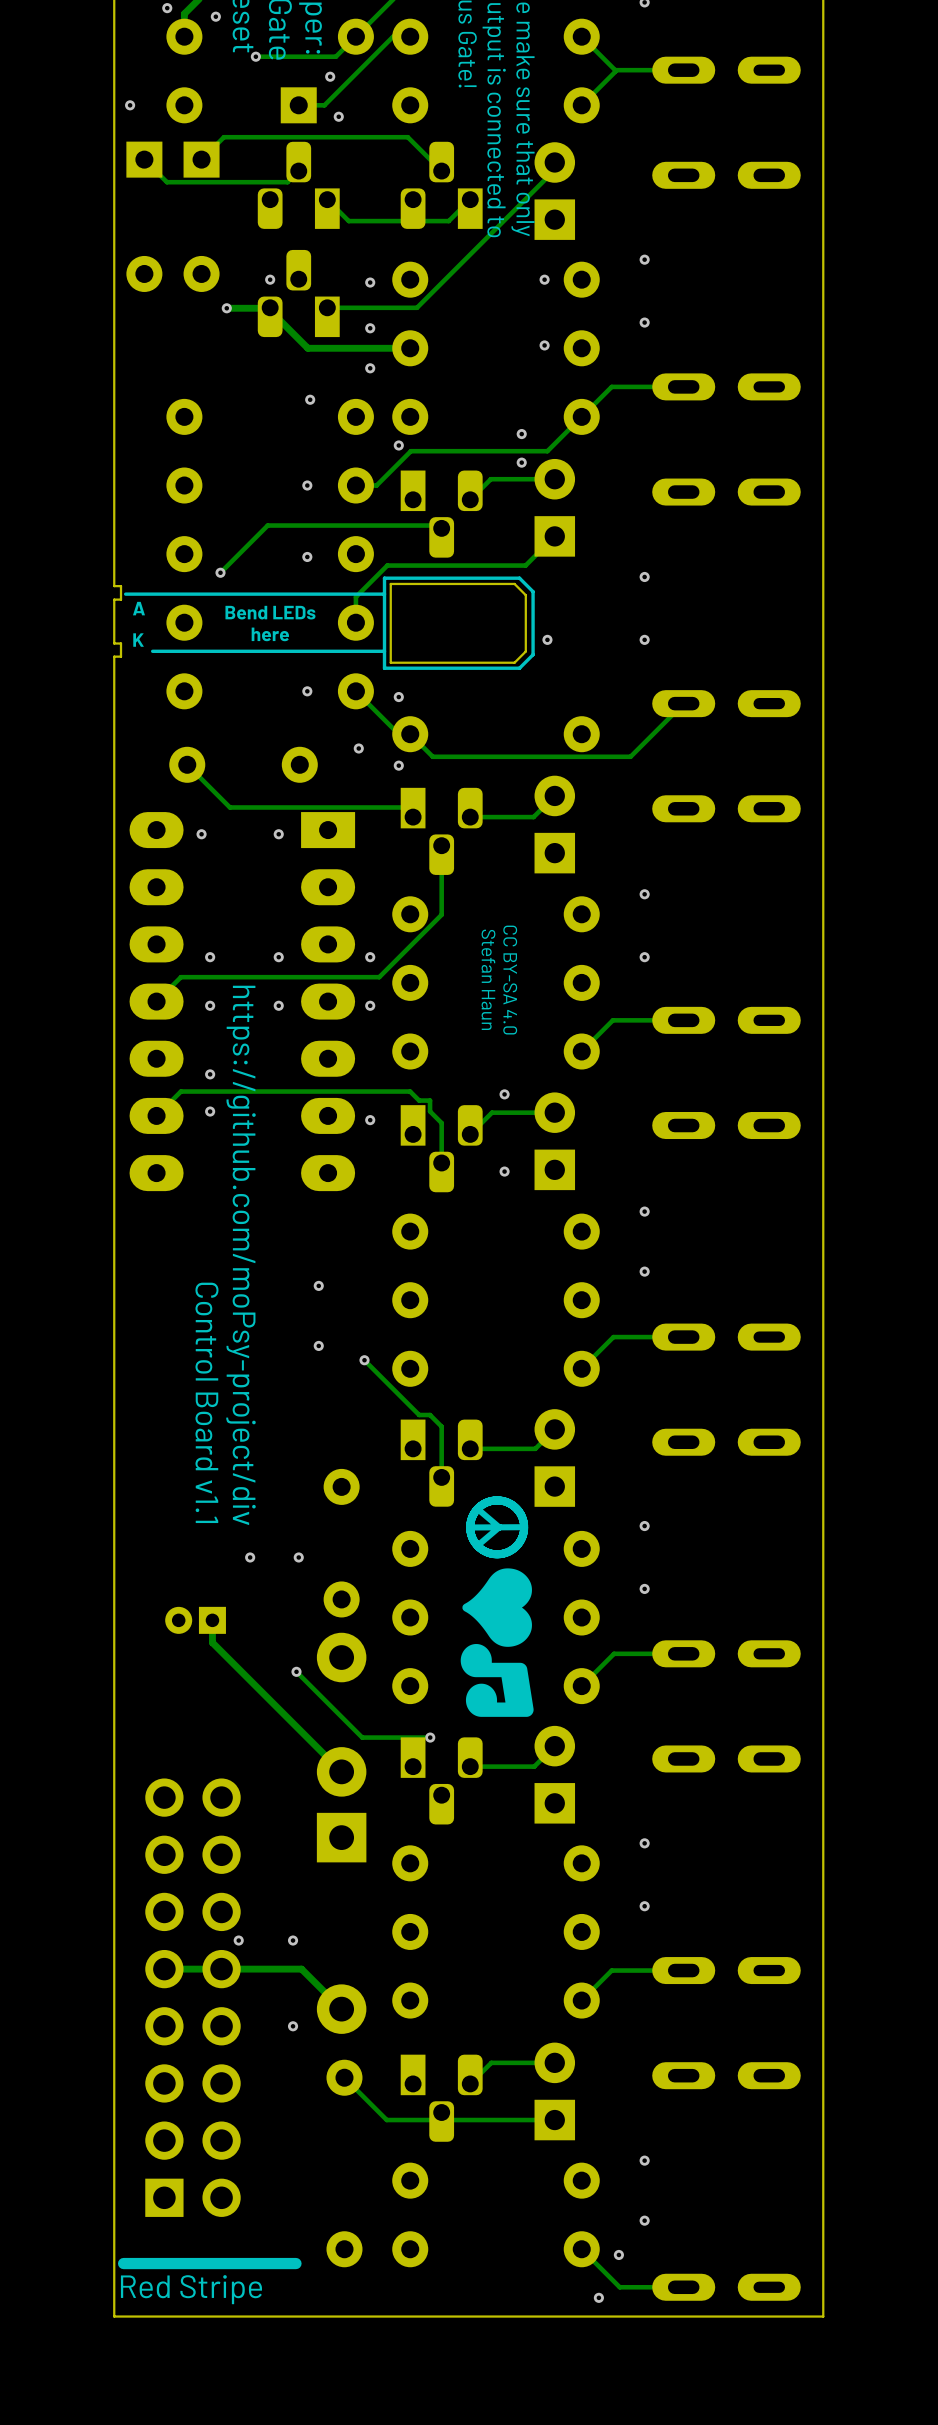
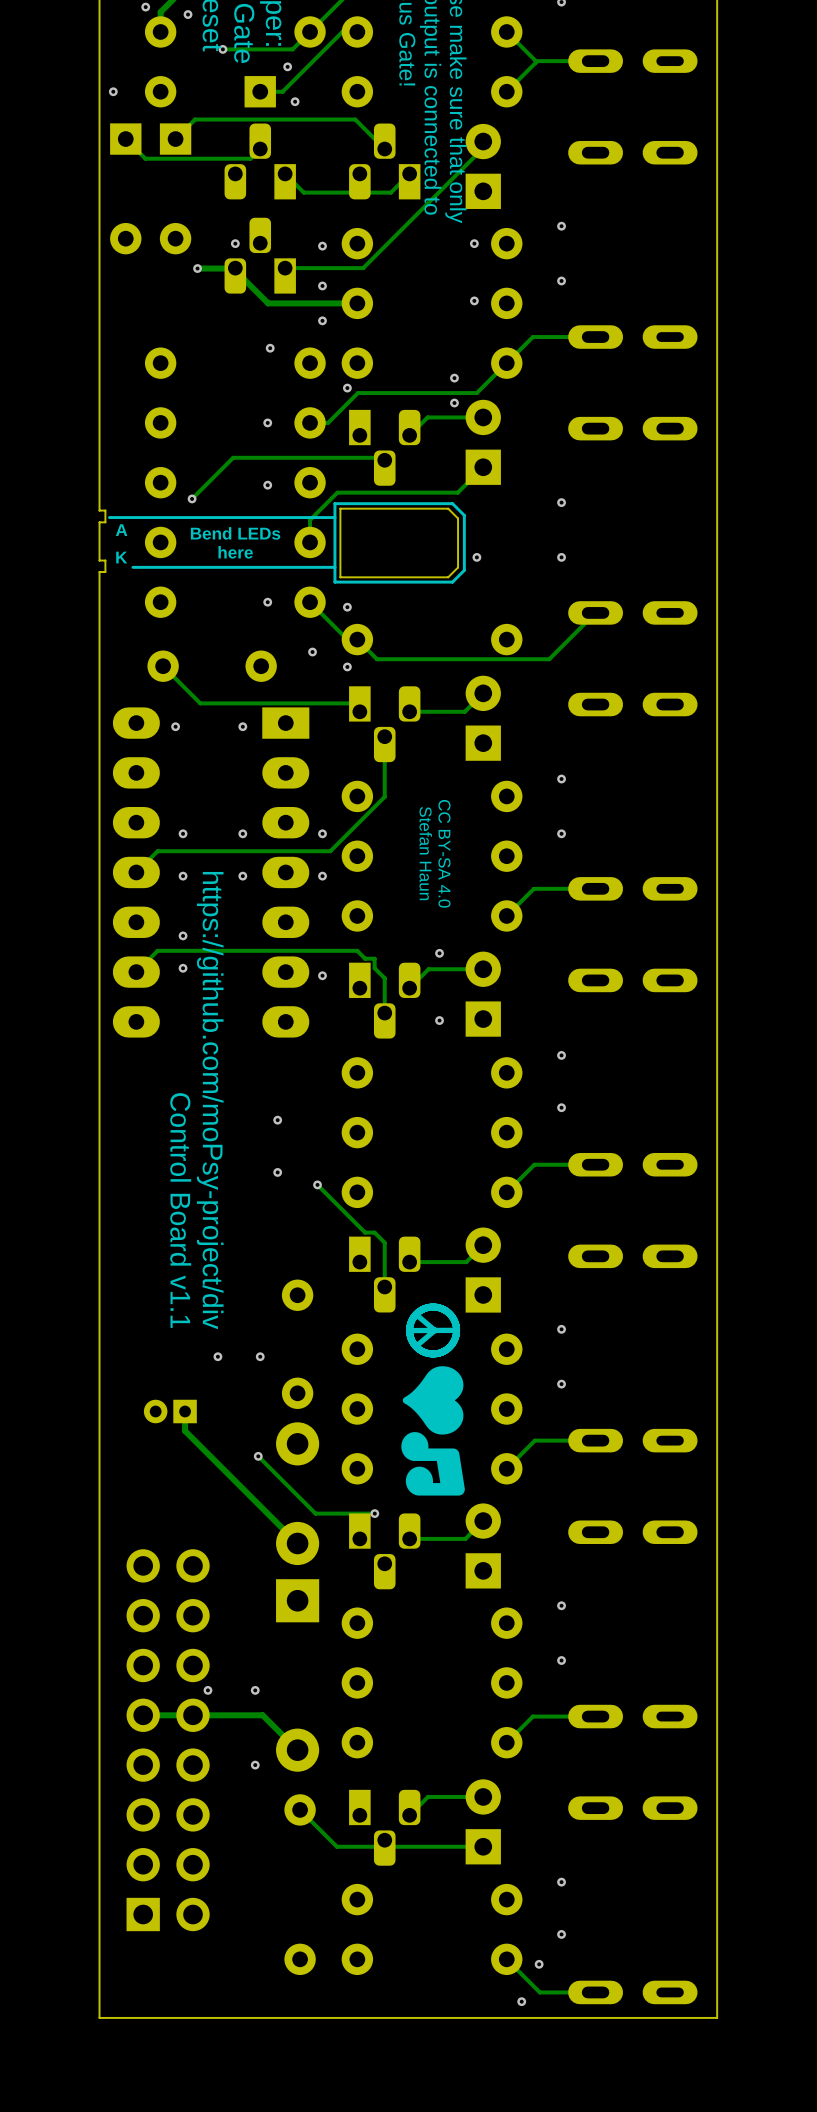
line: (295, 2263) (123, 2263) -> none
text: Red Stripe (191, 2289) -> none

